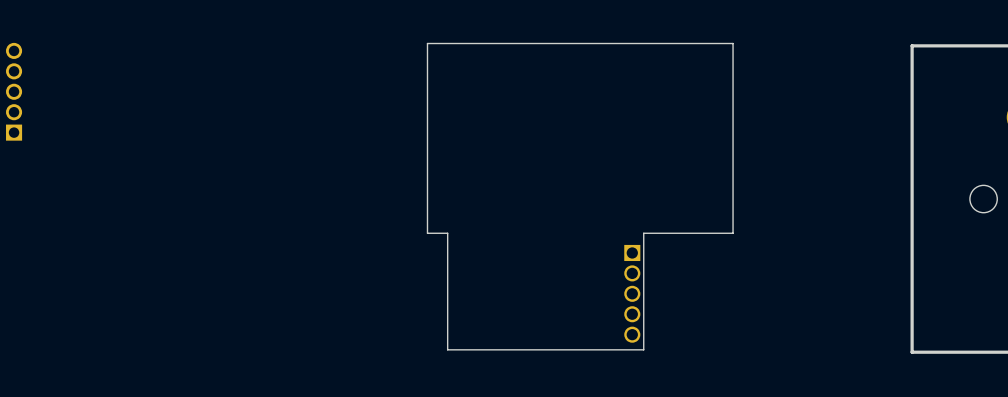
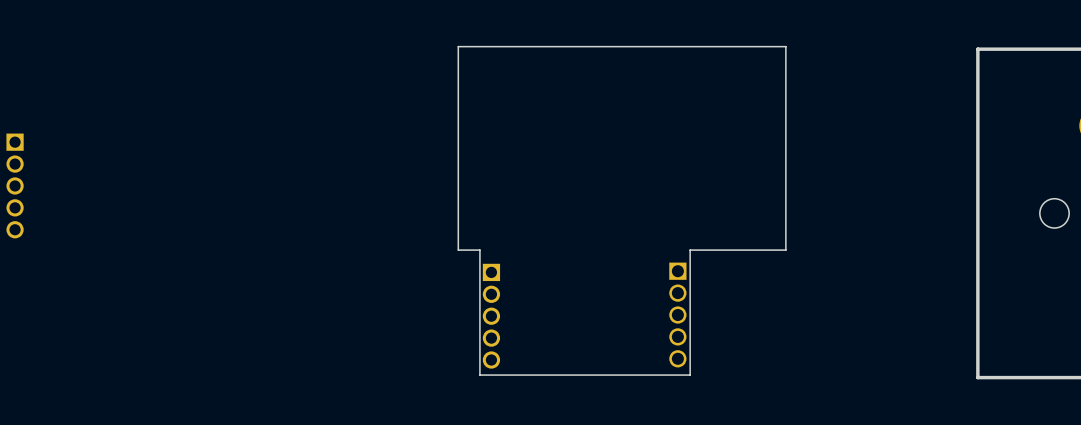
part rotation: 0° (14, 91) -> 180° (15, 185)
part position: (14, 91) -> (15, 185)
part: none -> (491, 316)

